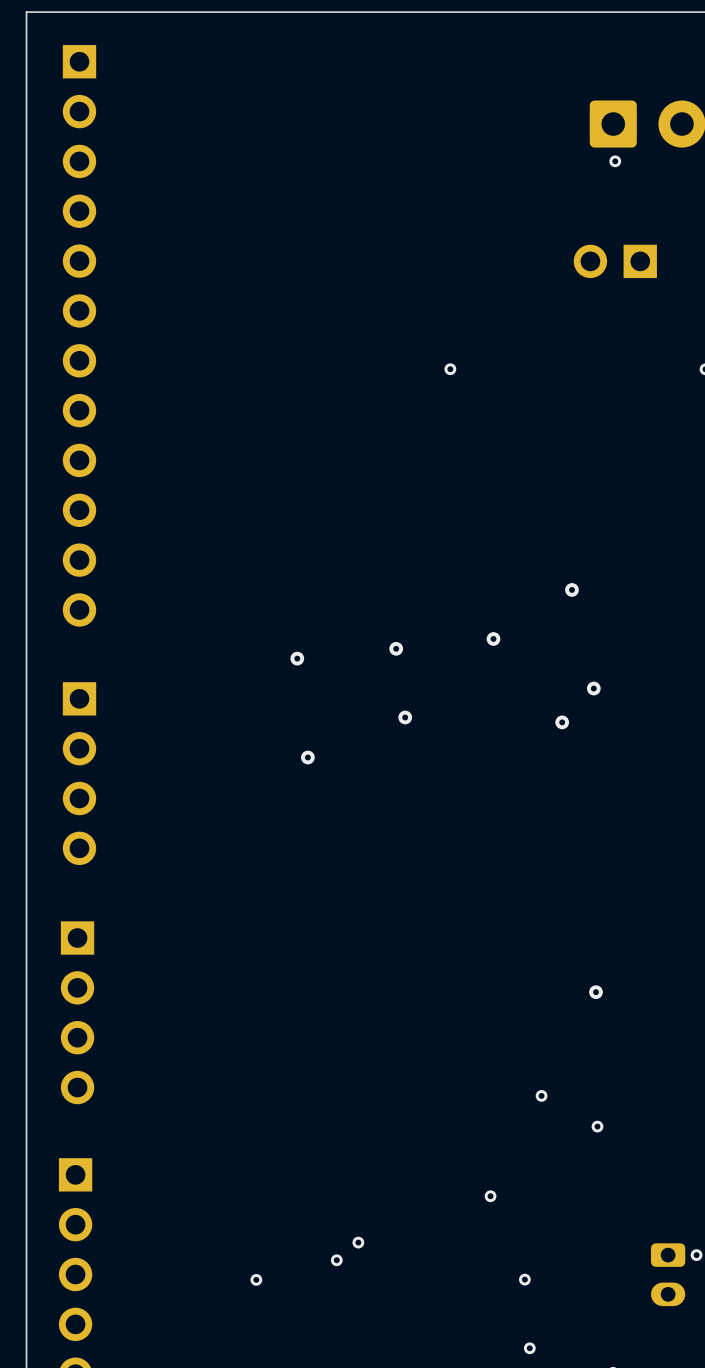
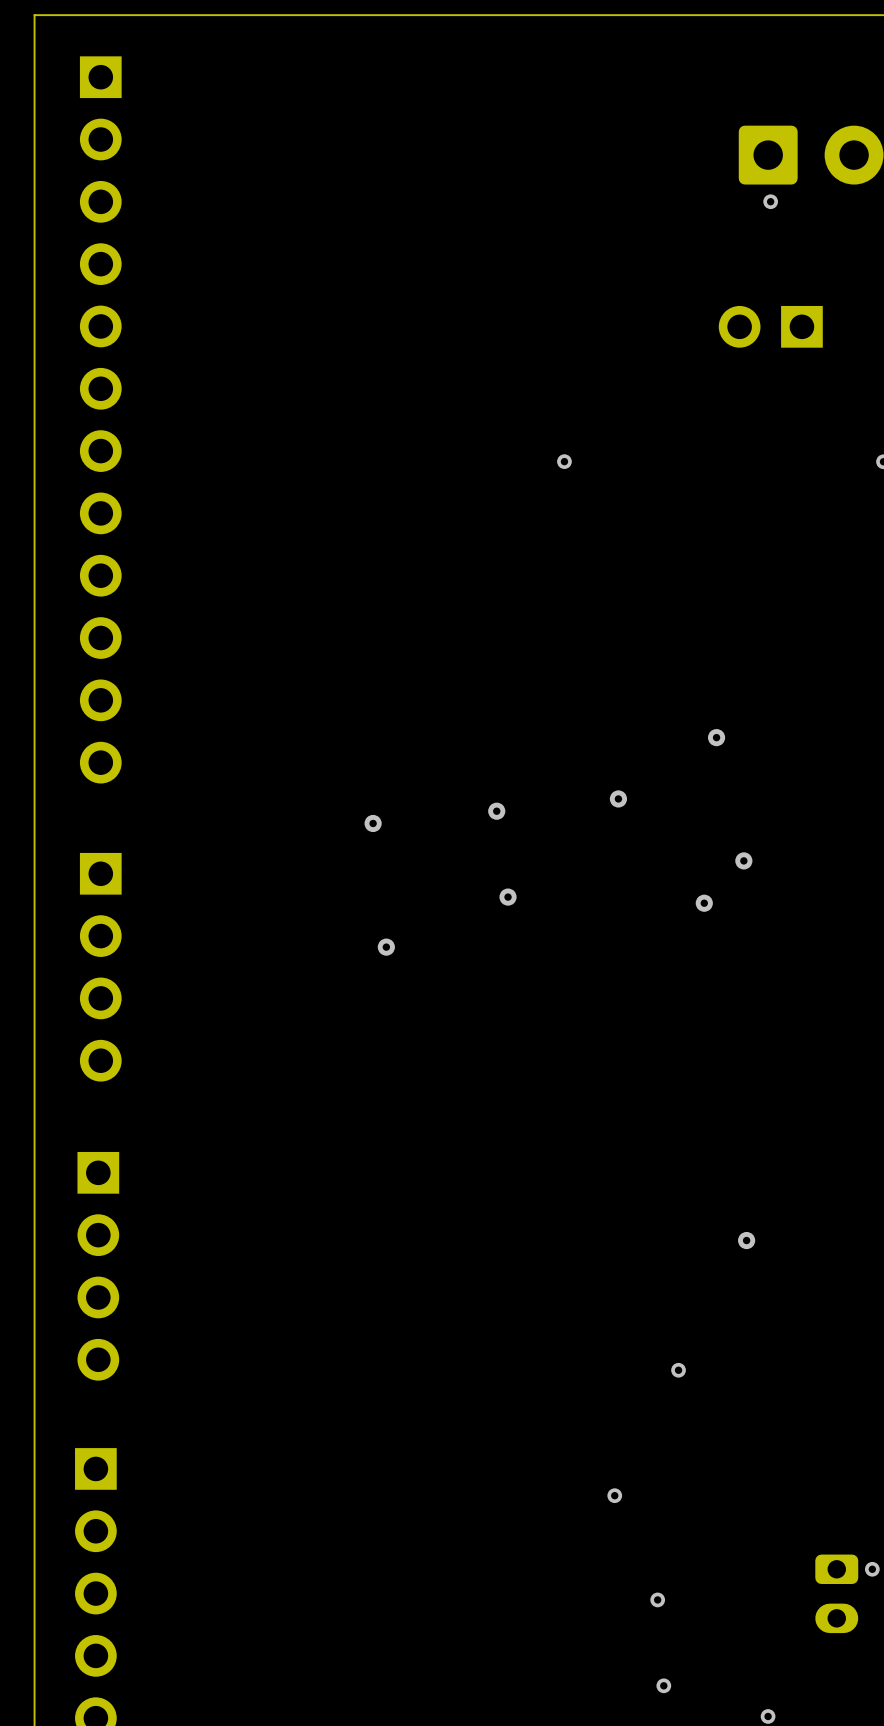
via: (597, 1126) -> none
via: (358, 1242) -> none
via: (336, 1260) -> none
via: (256, 1279) -> none

